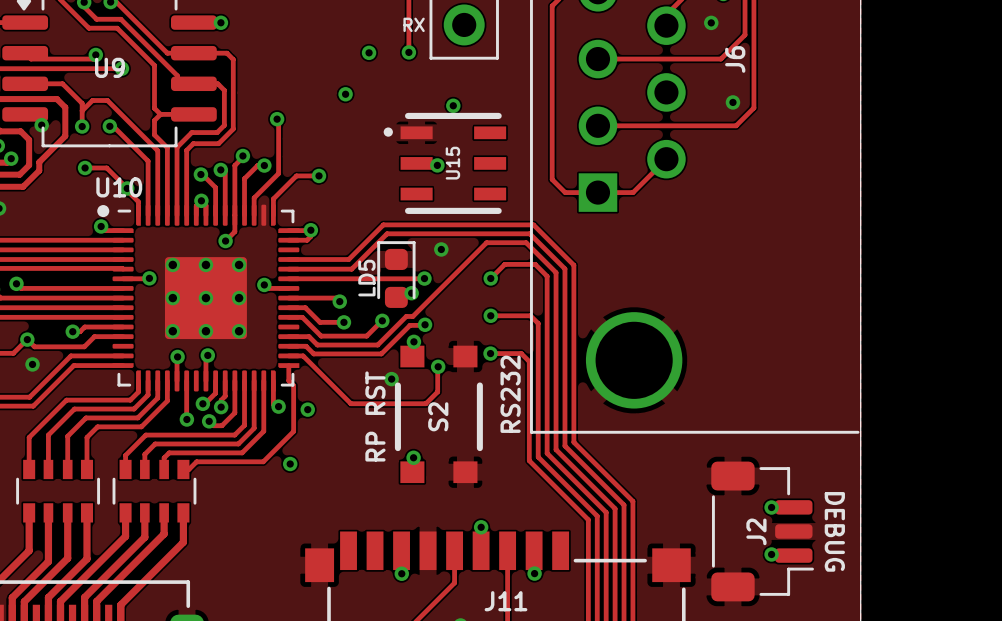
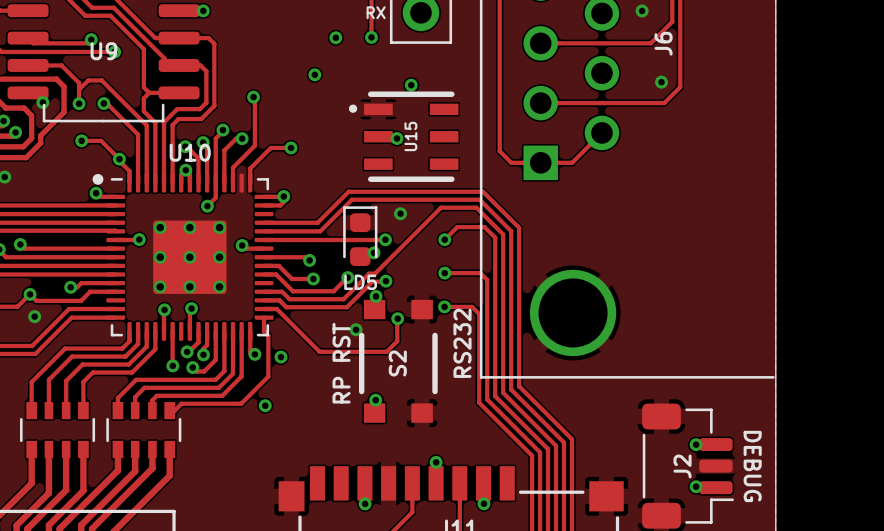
U10 name position: U10 (119, 187) -> U10 (190, 152)
LD5 name rotation: 0° (366, 278) -> 90° clockwise (360, 282)
LD5 name position: LD5 (366, 278) -> LD5 (360, 282)

